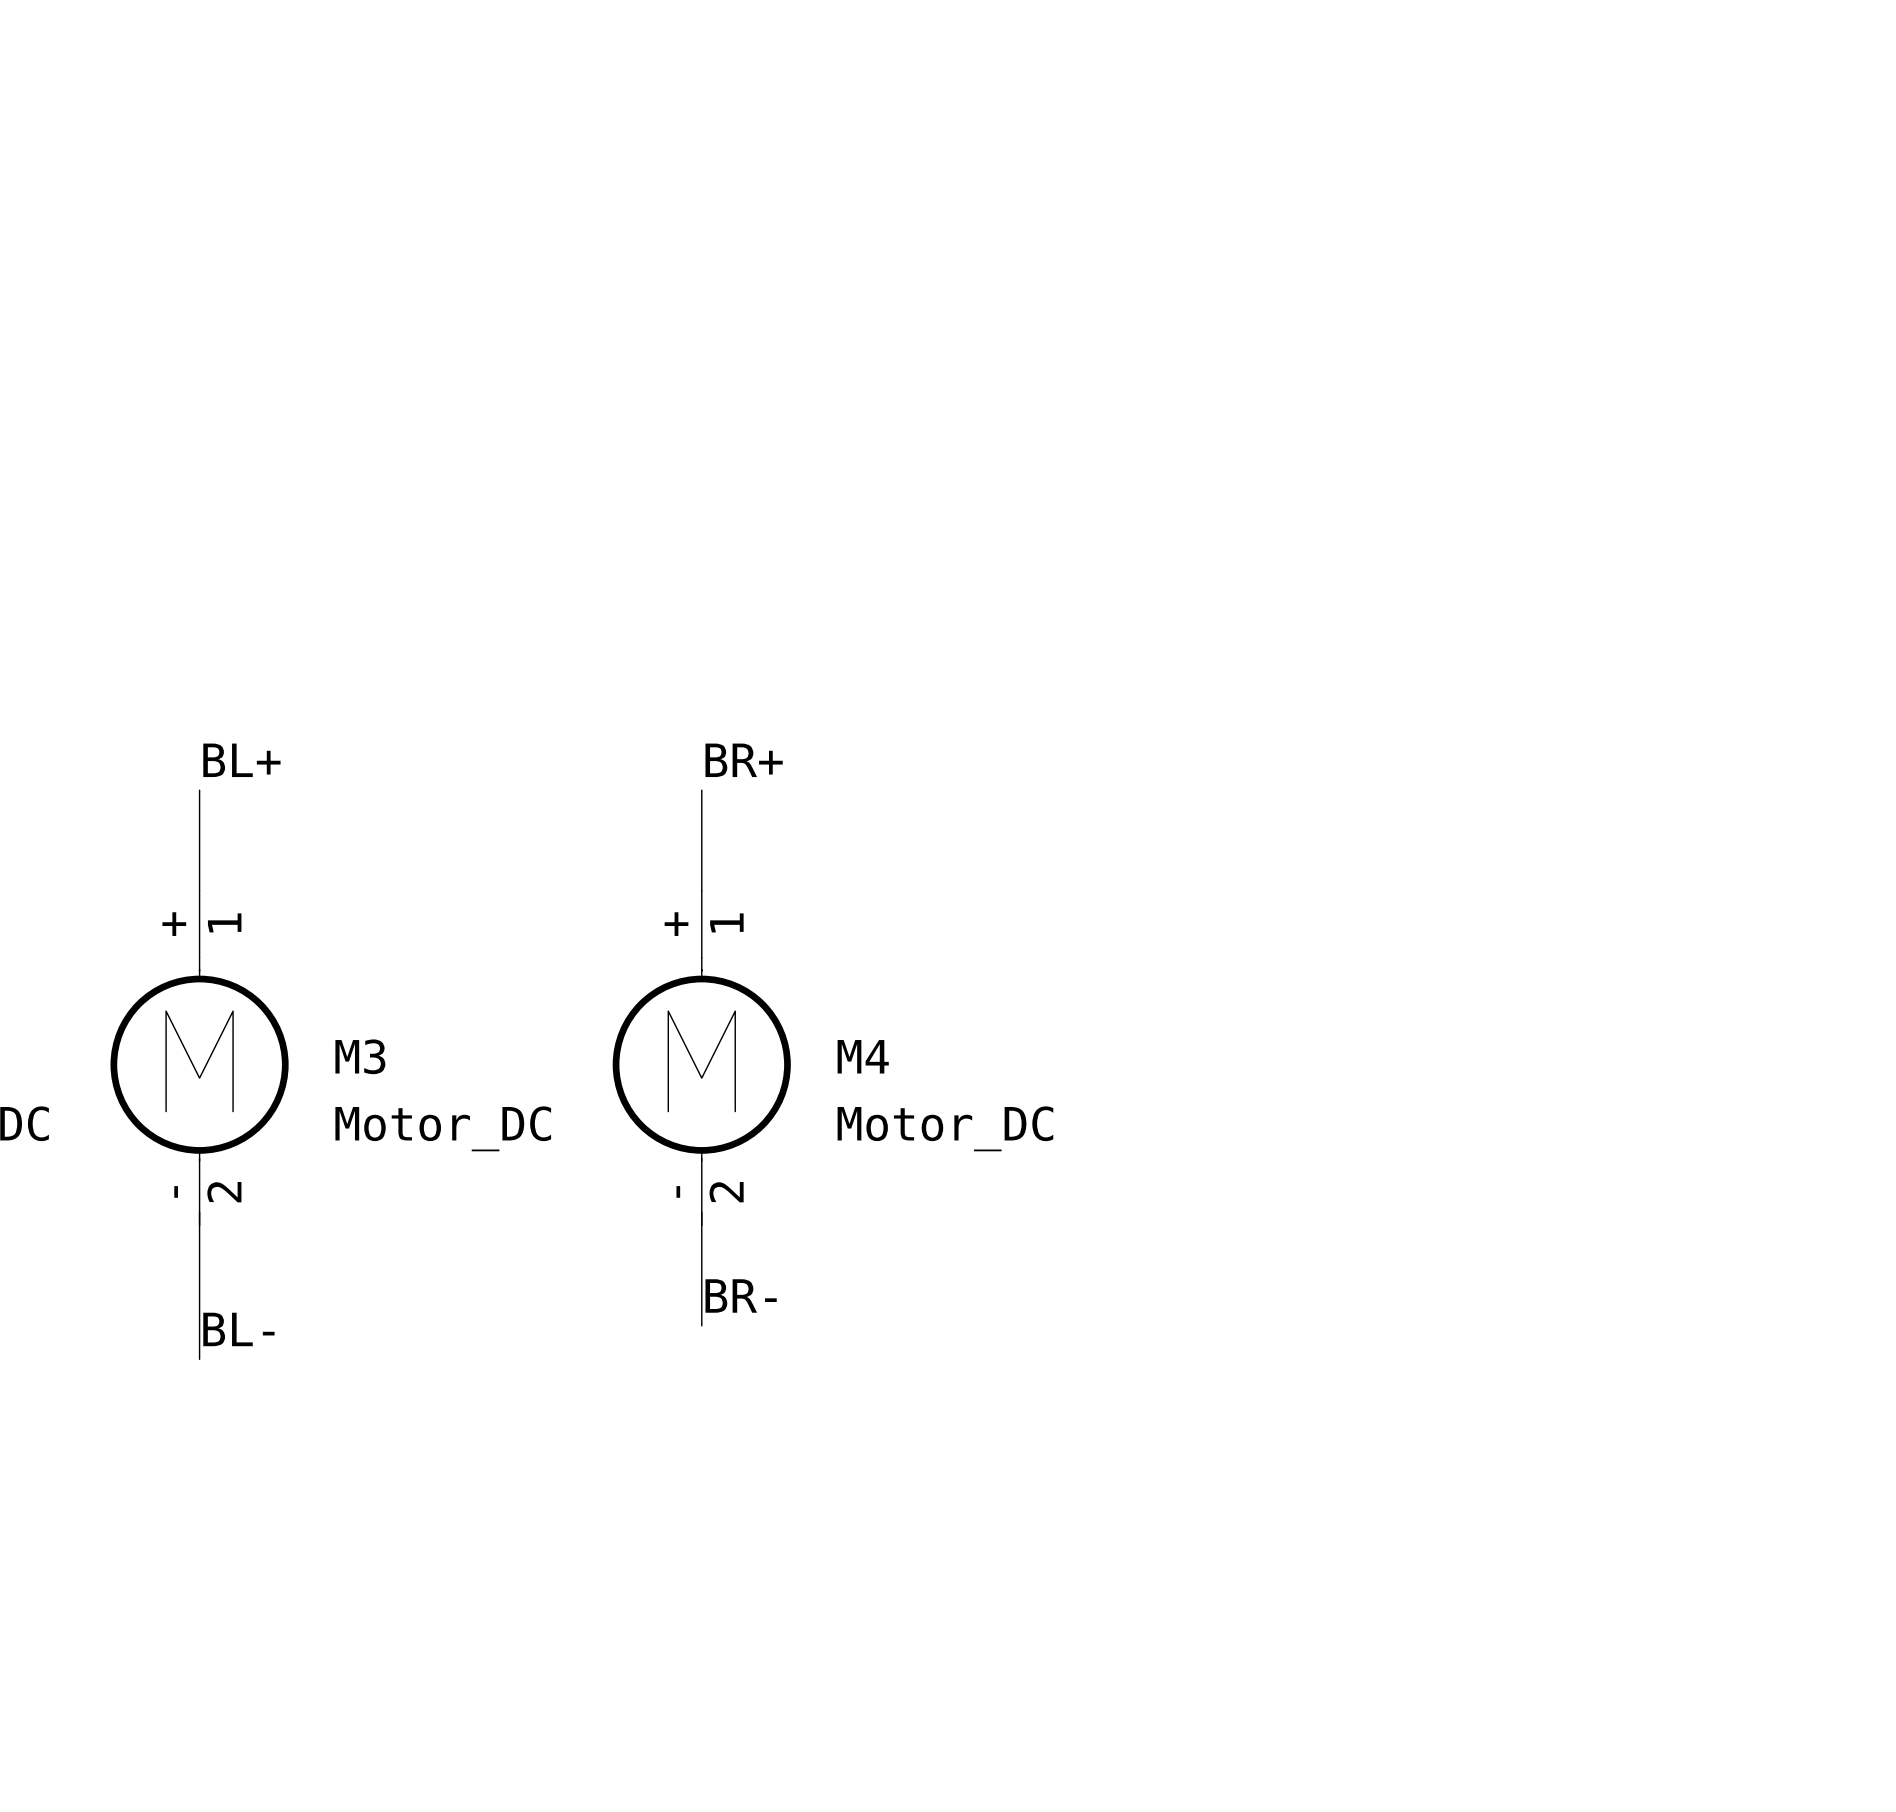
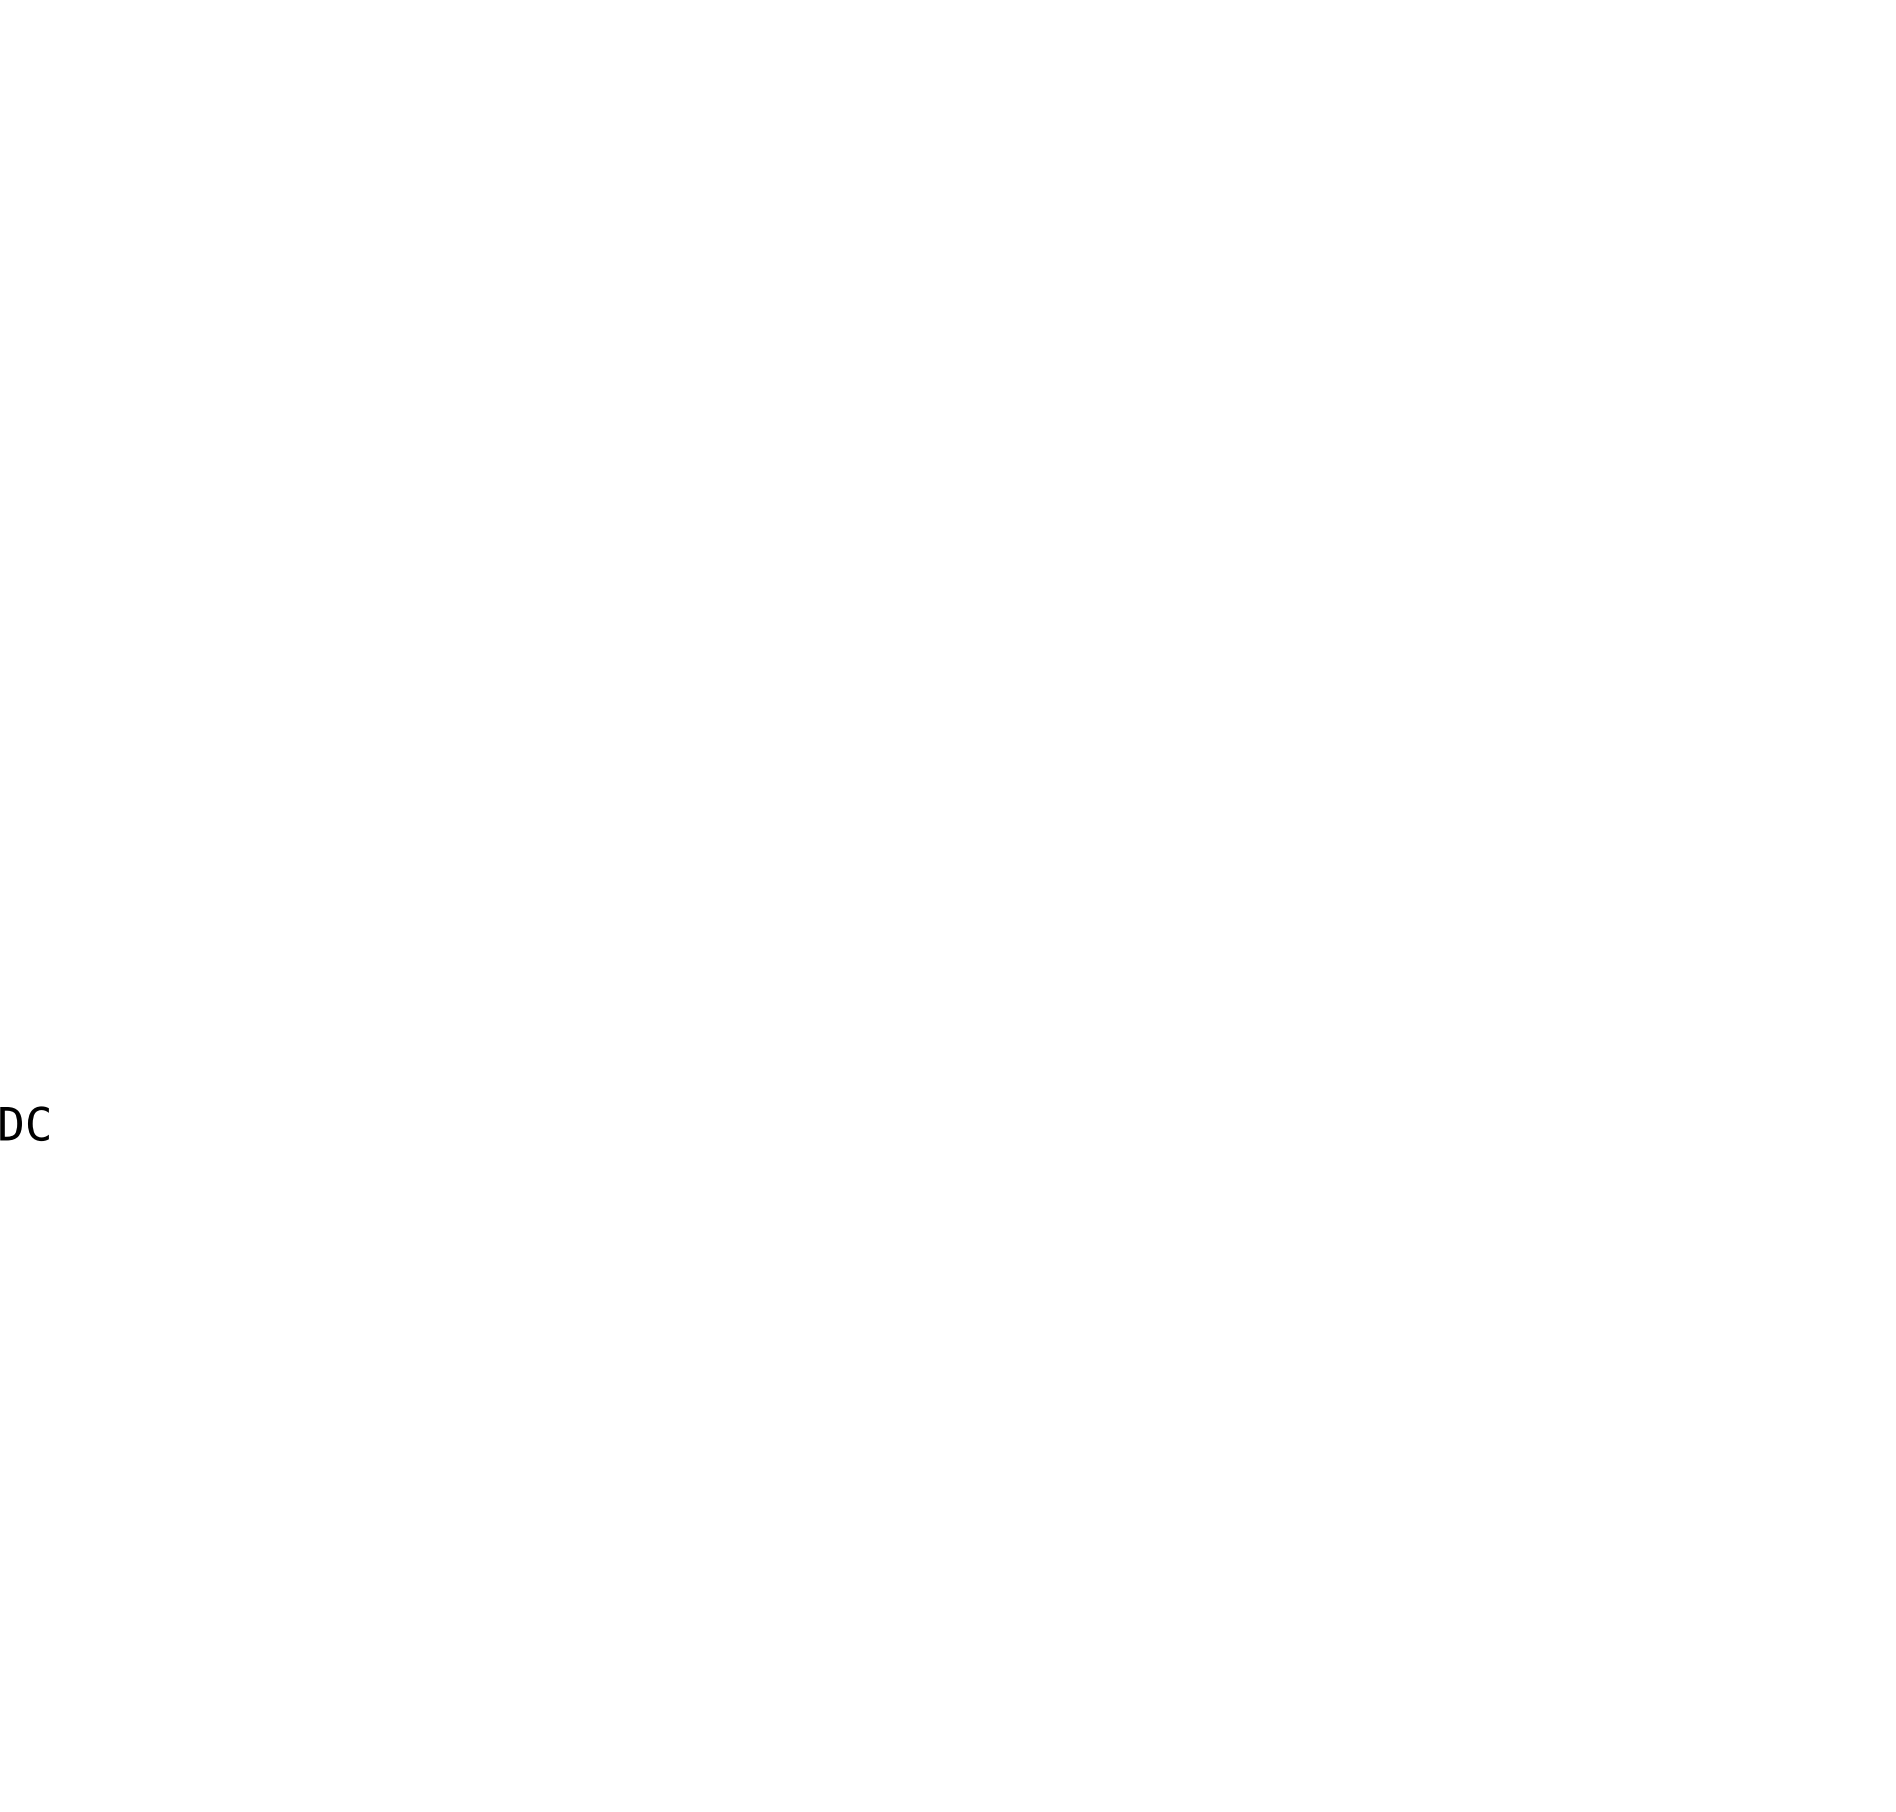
label: BL+ (241, 760) -> none
label: BR+ (744, 760) -> none
wire: (199, 790) (199, 890) -> none
wire: (701, 790) (701, 890) -> none
M3: Motor_DC (199, 1058) -> none
M4: Motor_DC (701, 1058) -> none
wire: (199, 1225) (199, 1359) -> none
wire: (701, 1225) (701, 1325) -> none
label: BR- (741, 1295) -> none
label: BL- (238, 1329) -> none

